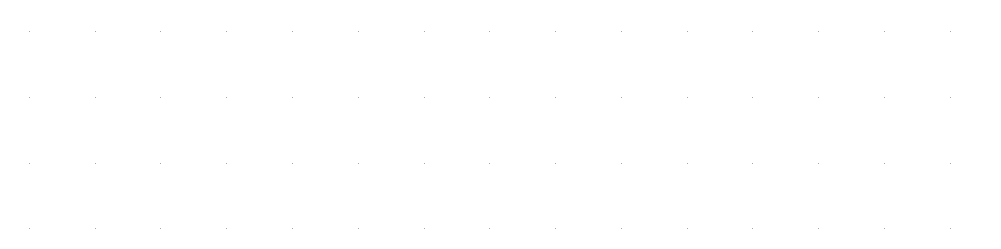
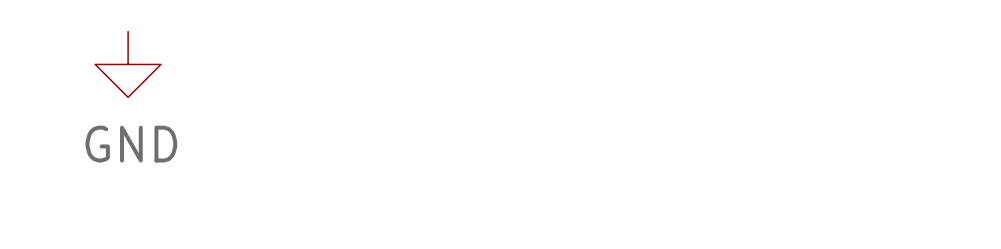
power symbol: none -> GND (128, 64)

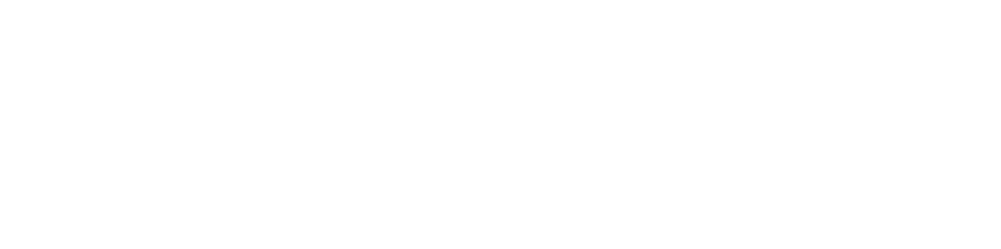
power symbol: GND (128, 64) -> none

